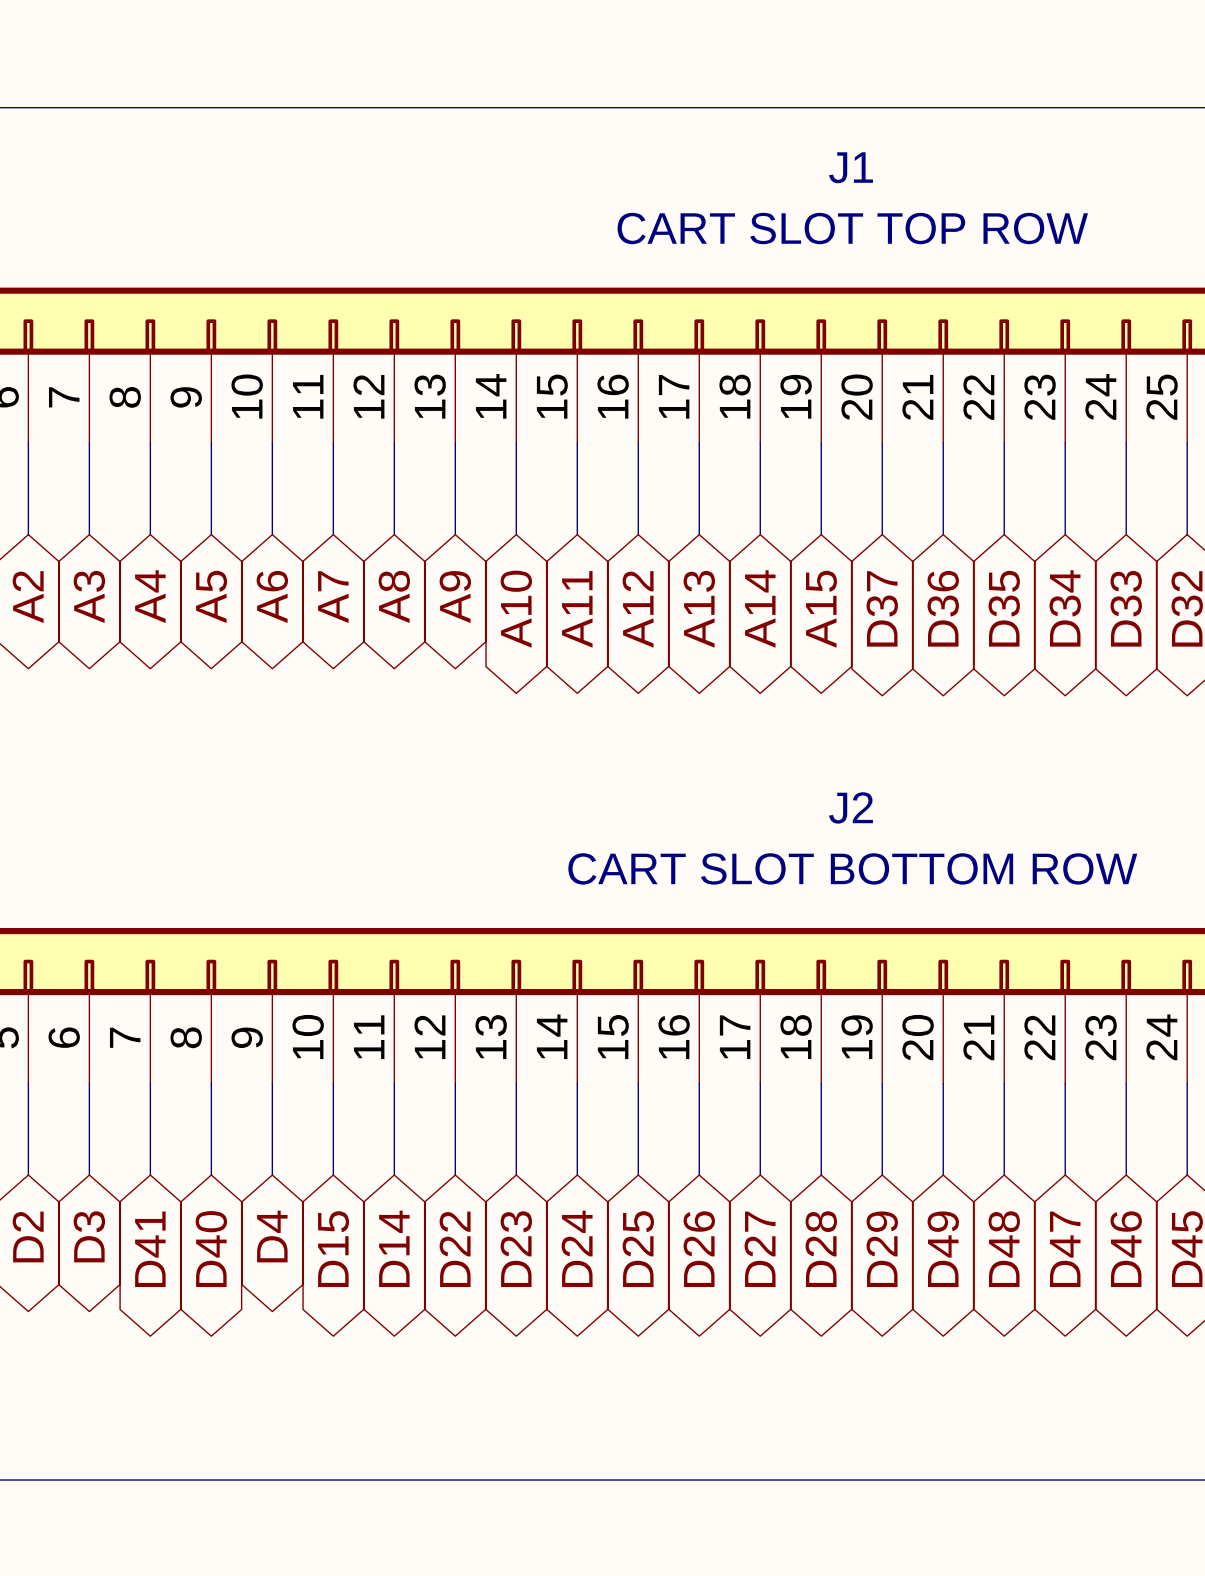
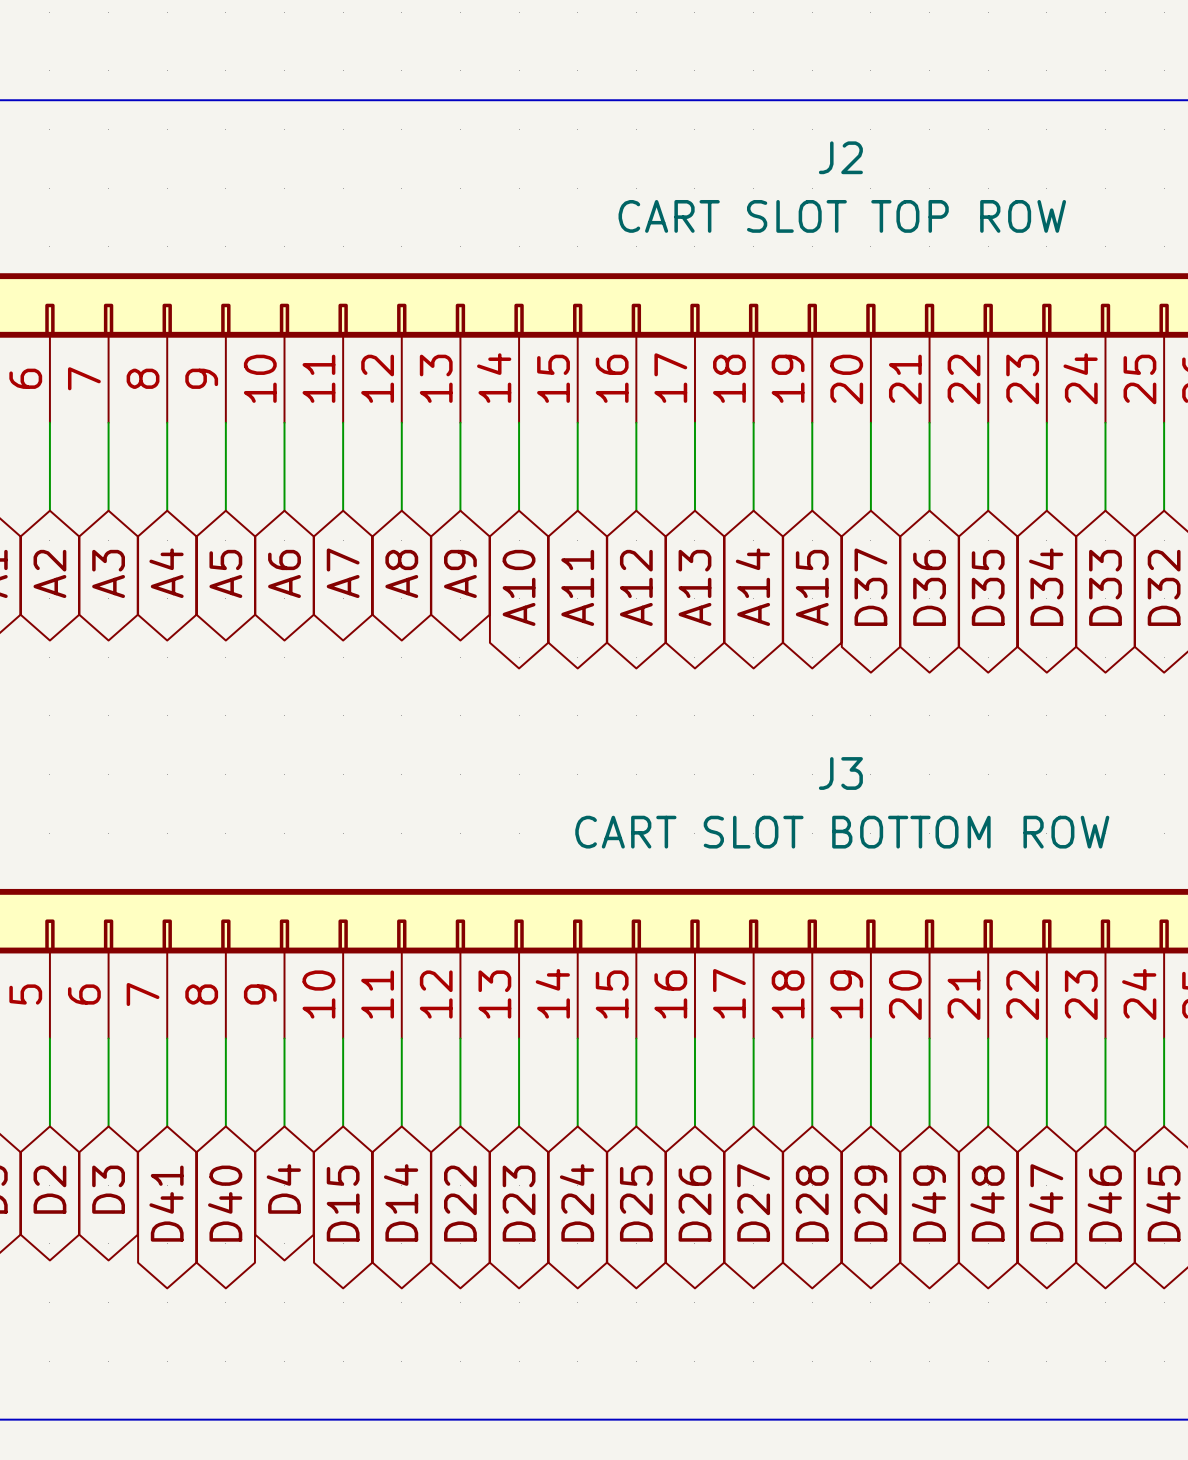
J1 name: J1 (851, 167) -> J2 (840, 157)
J2 name: J2 (851, 807) -> J3 (840, 773)

